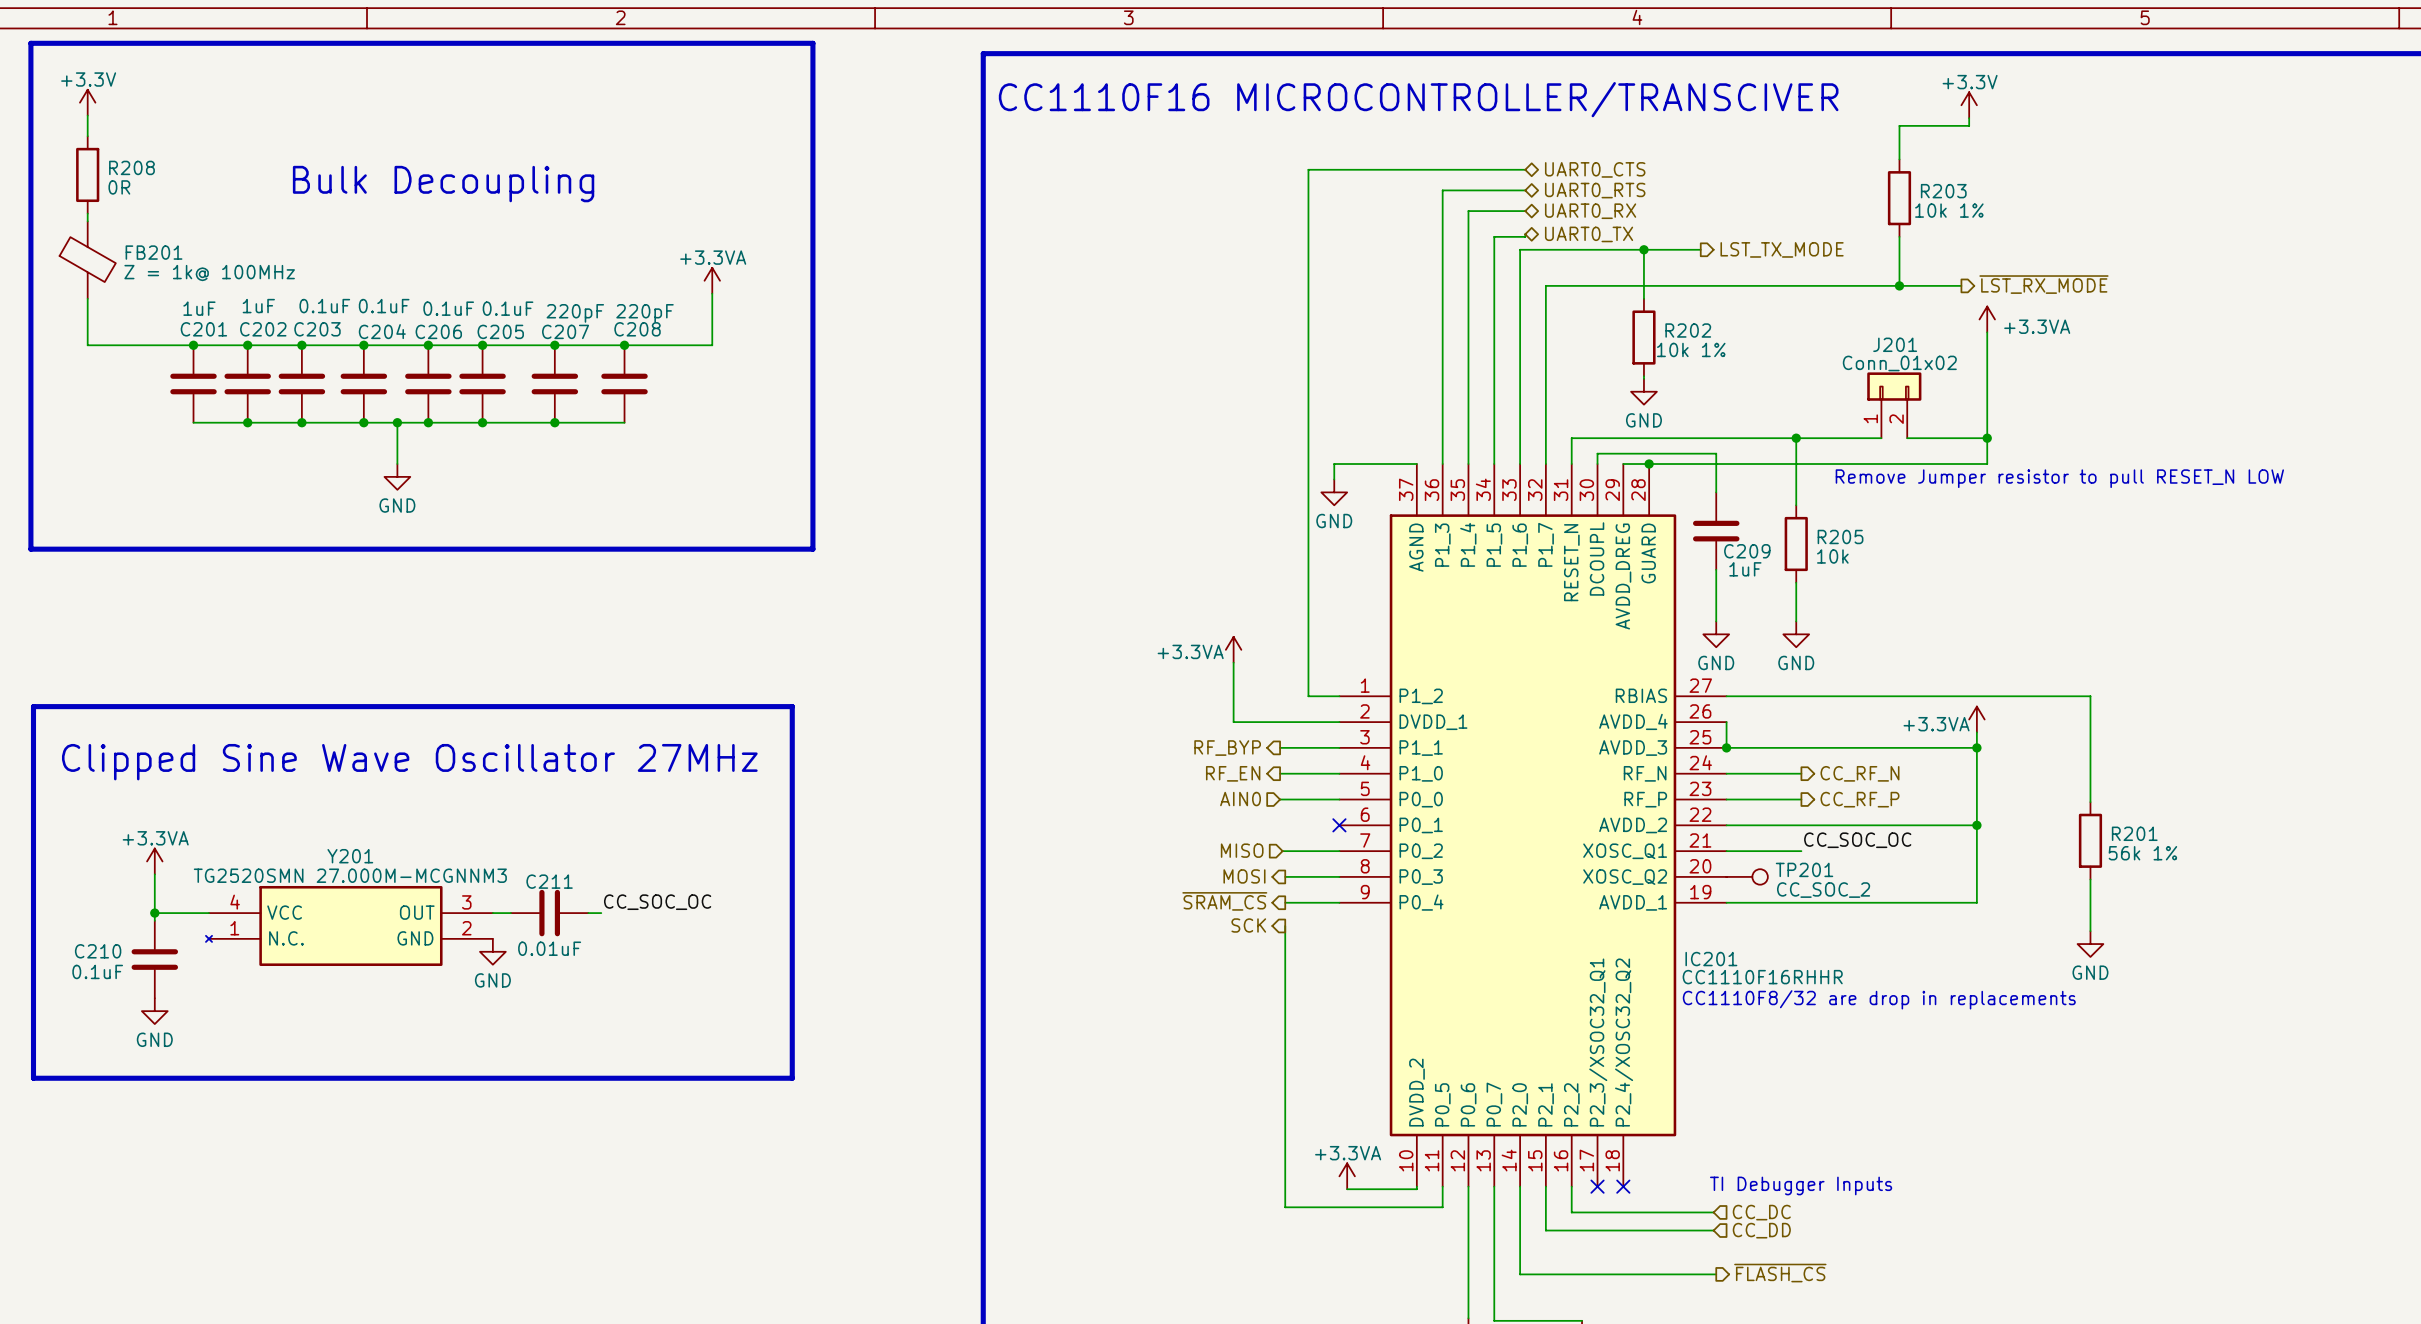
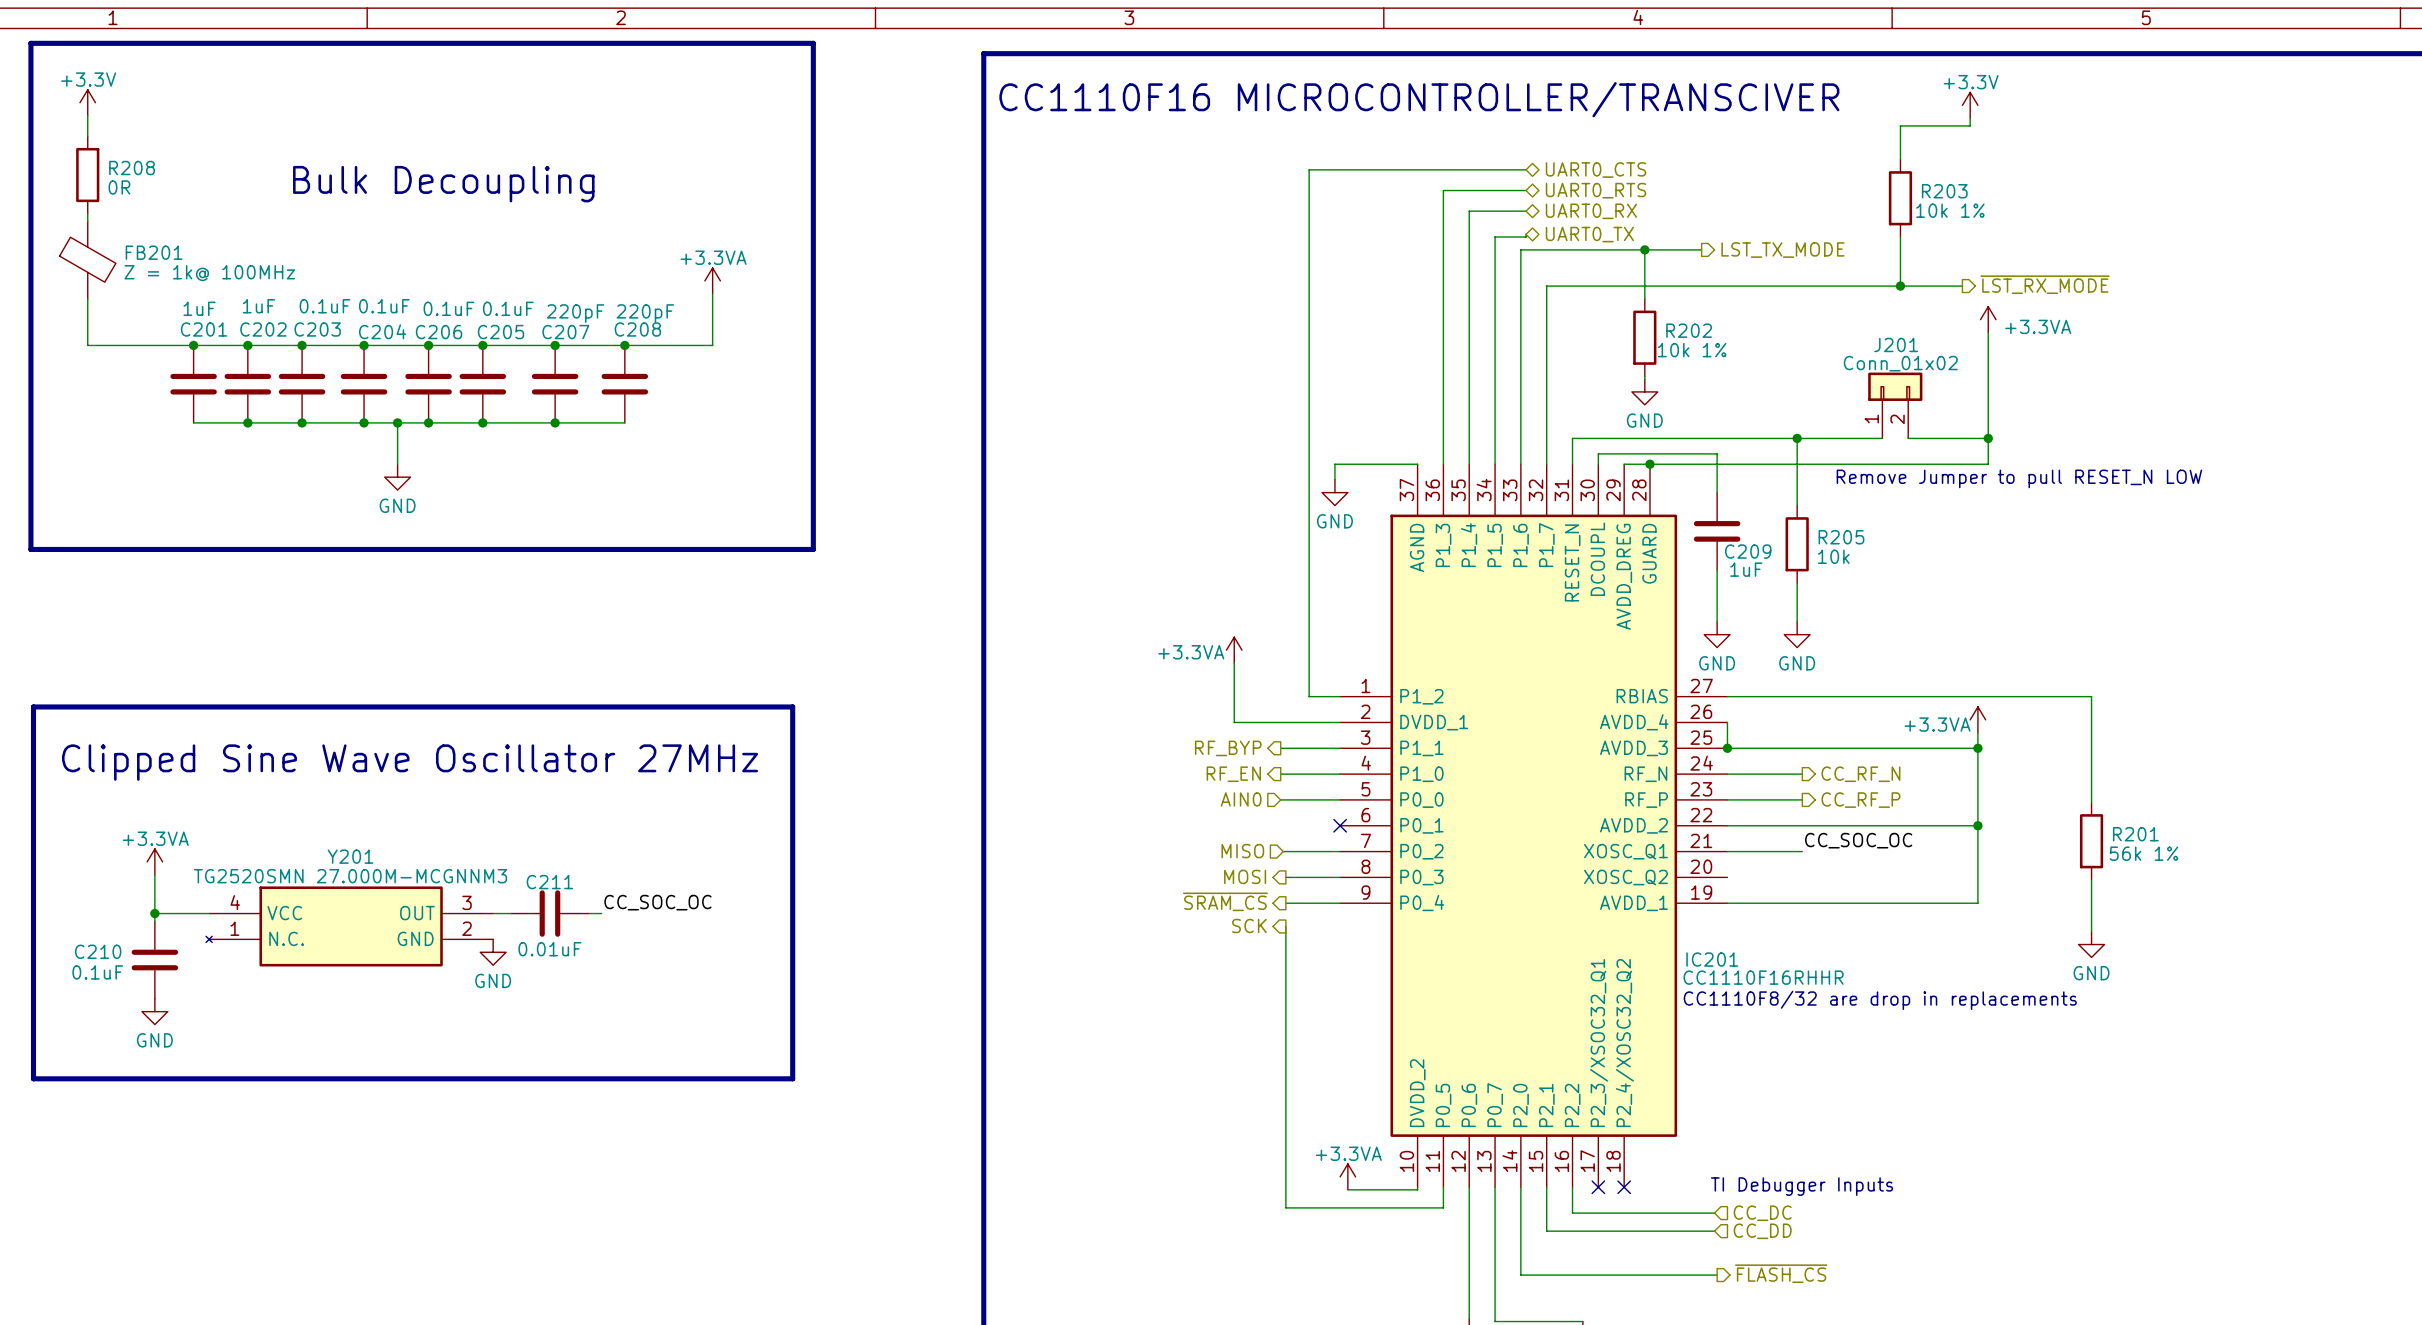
text: Remove Jumper resistor to pull RESET_N LOW (2059, 478) -> Remove Jumper to pull RESET_N LOW (2019, 478)
TP201: CC_SOC_2 (1747, 876) -> none

